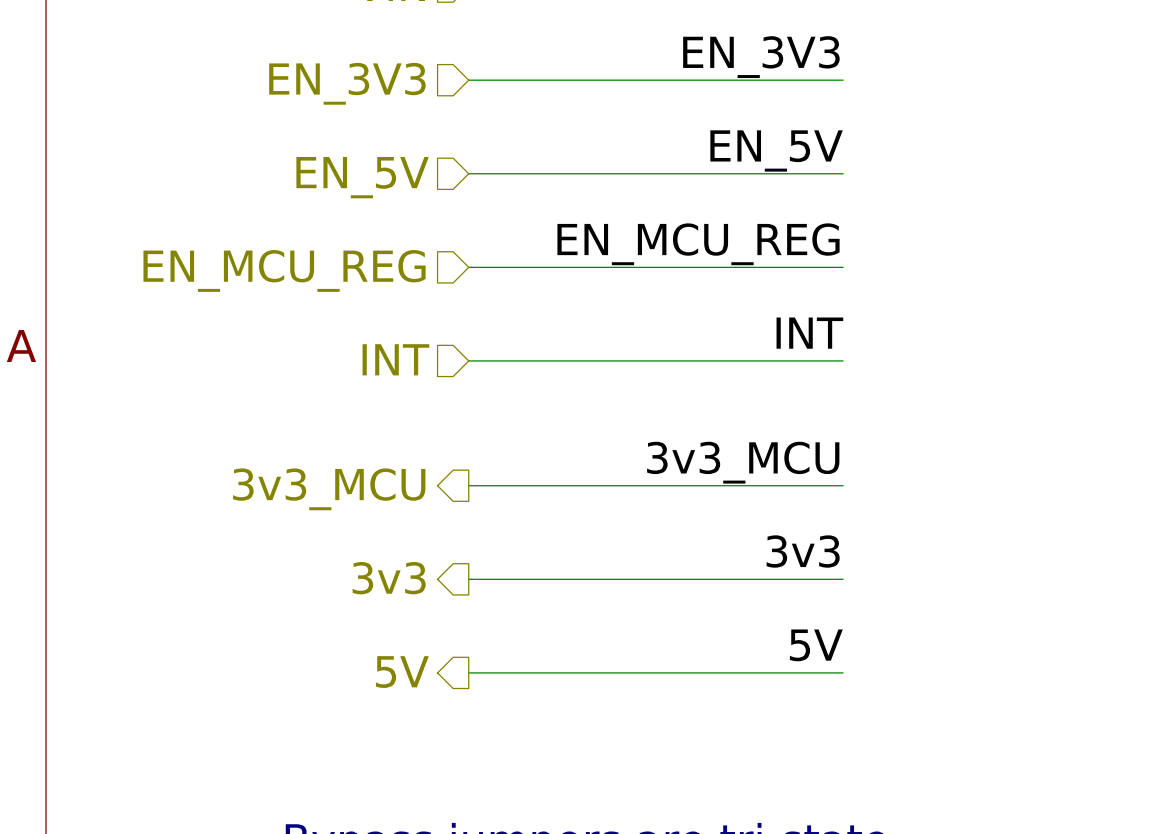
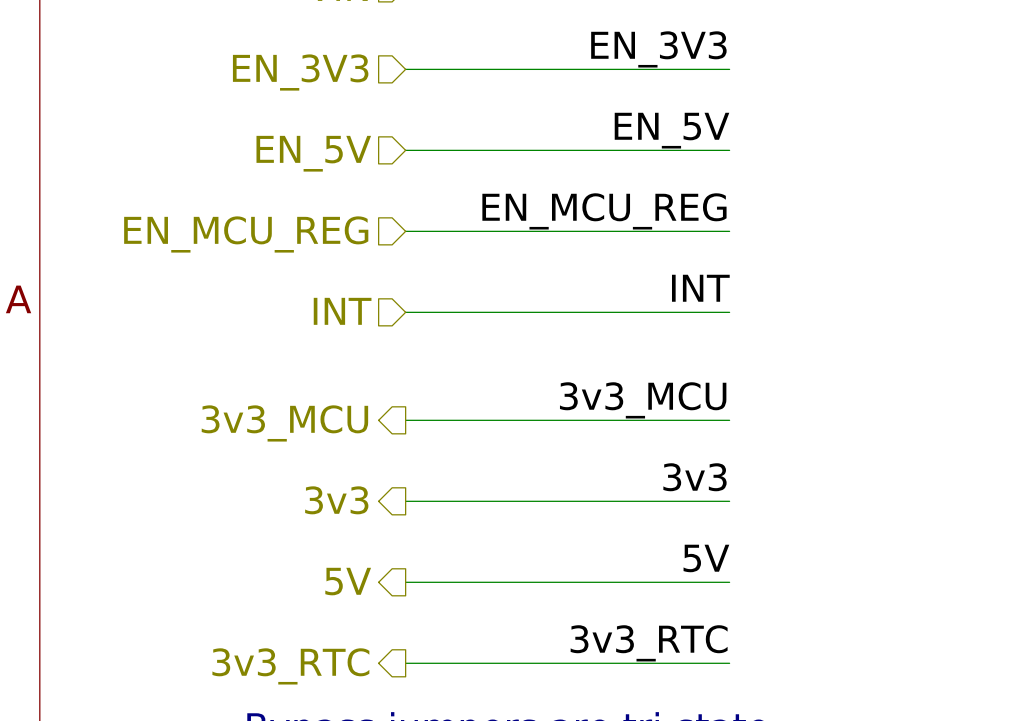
label: none -> 3v3_RTC (649, 643)
wire: none -> (405, 663) (729, 663)
hierarchical label: none -> 3v3_RTC (290, 666)

